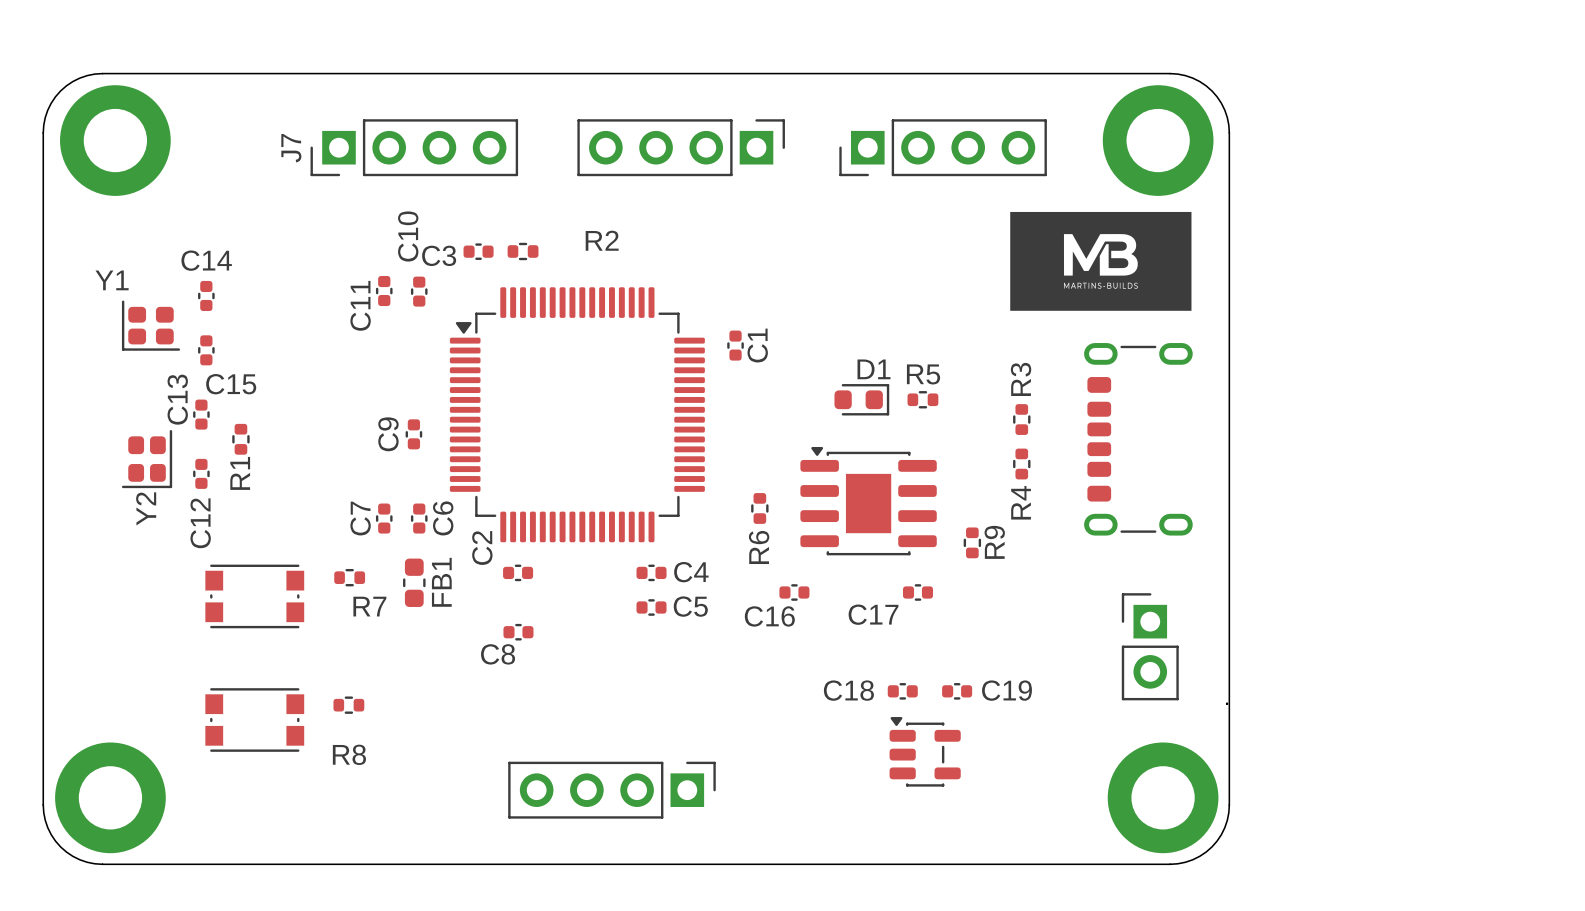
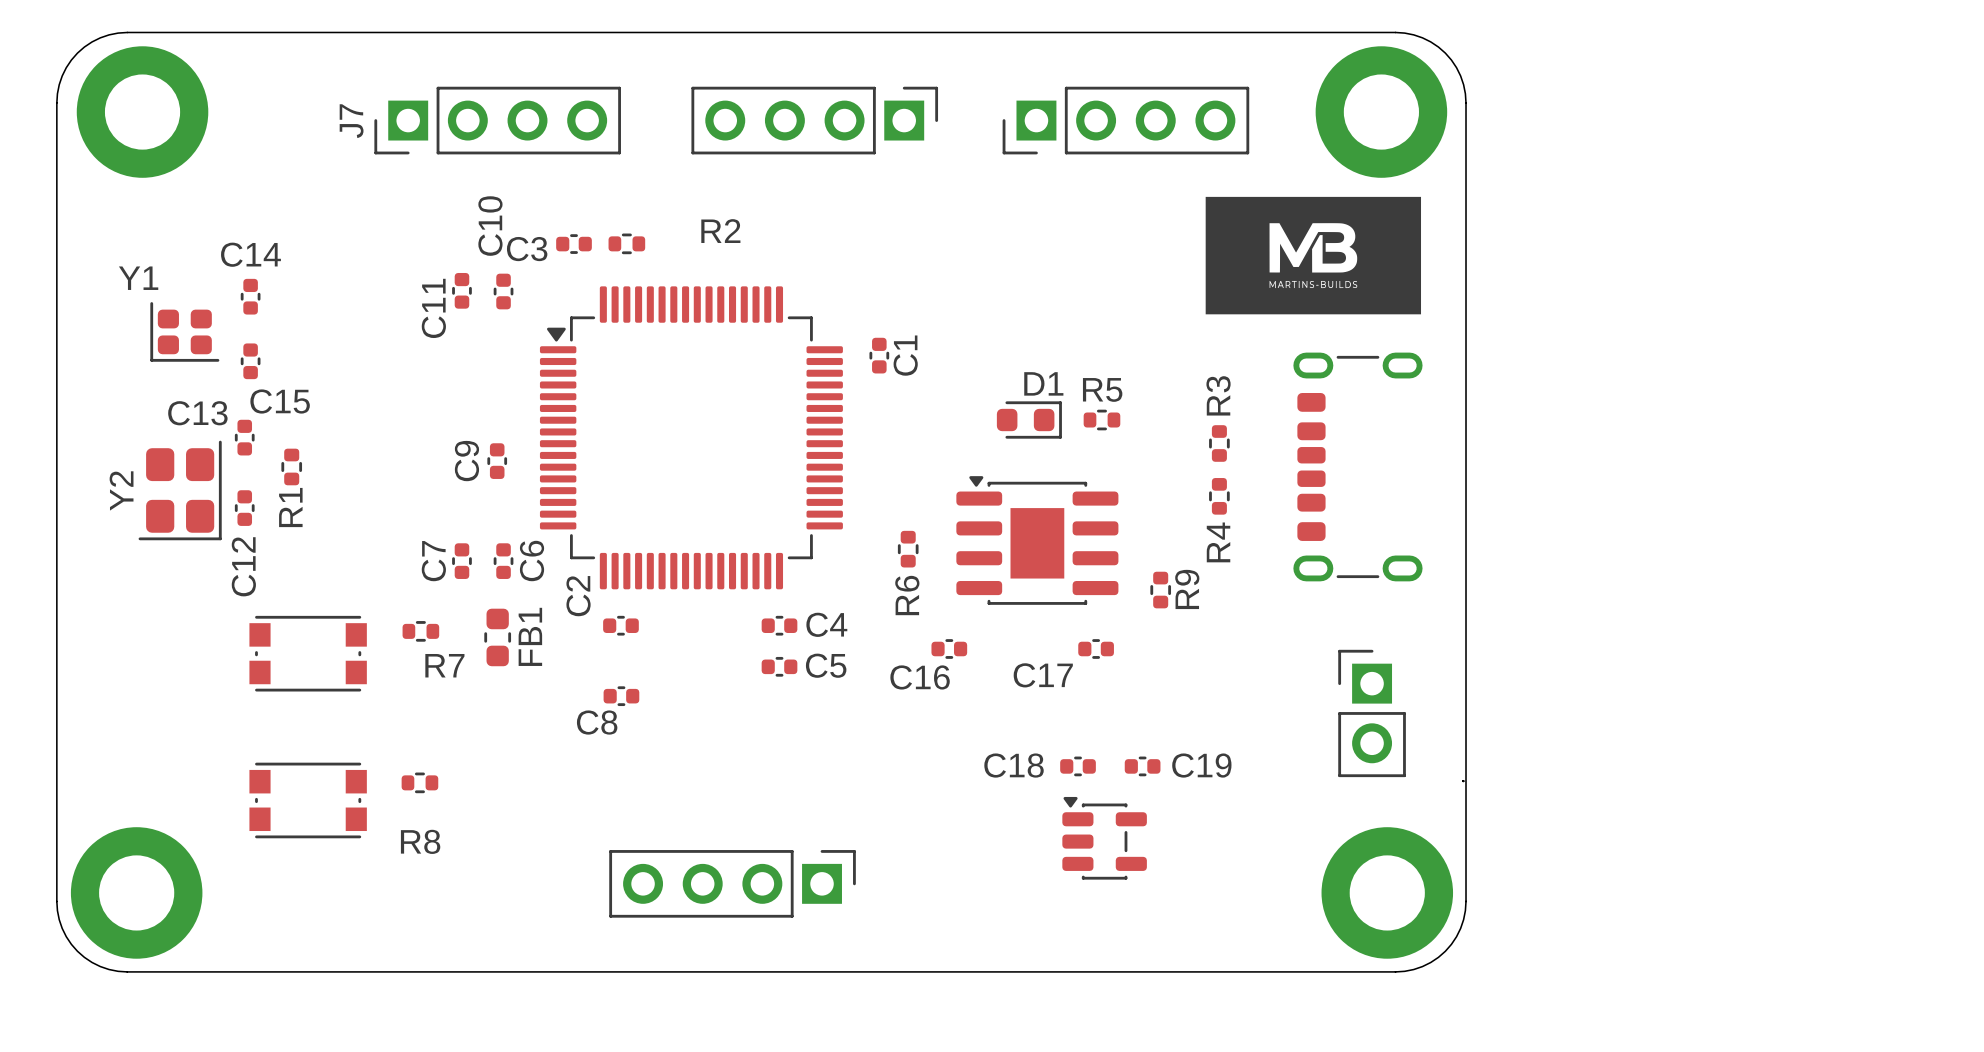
C13 name rotation: 0° (177, 399) -> 90° clockwise (197, 413)
Y2 footprint: [121, 430, 173, 489] -> [138, 440, 222, 541]
Y2 name position: Y2 (146, 508) -> Y2 (121, 490)

